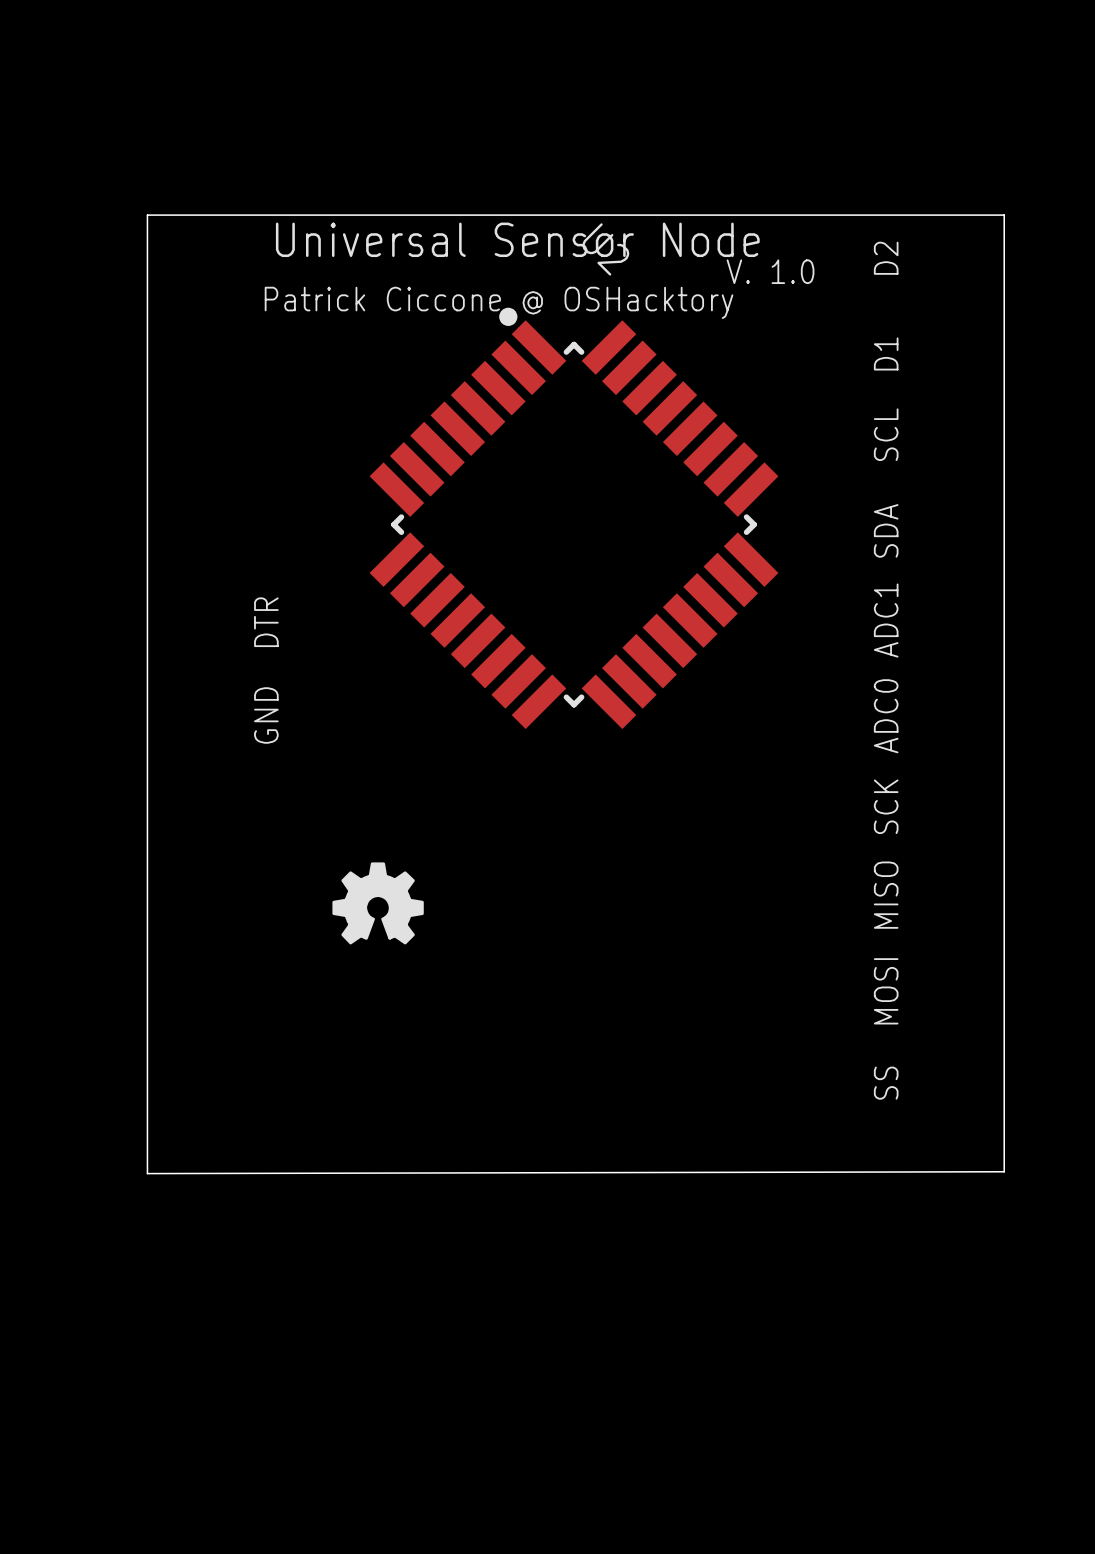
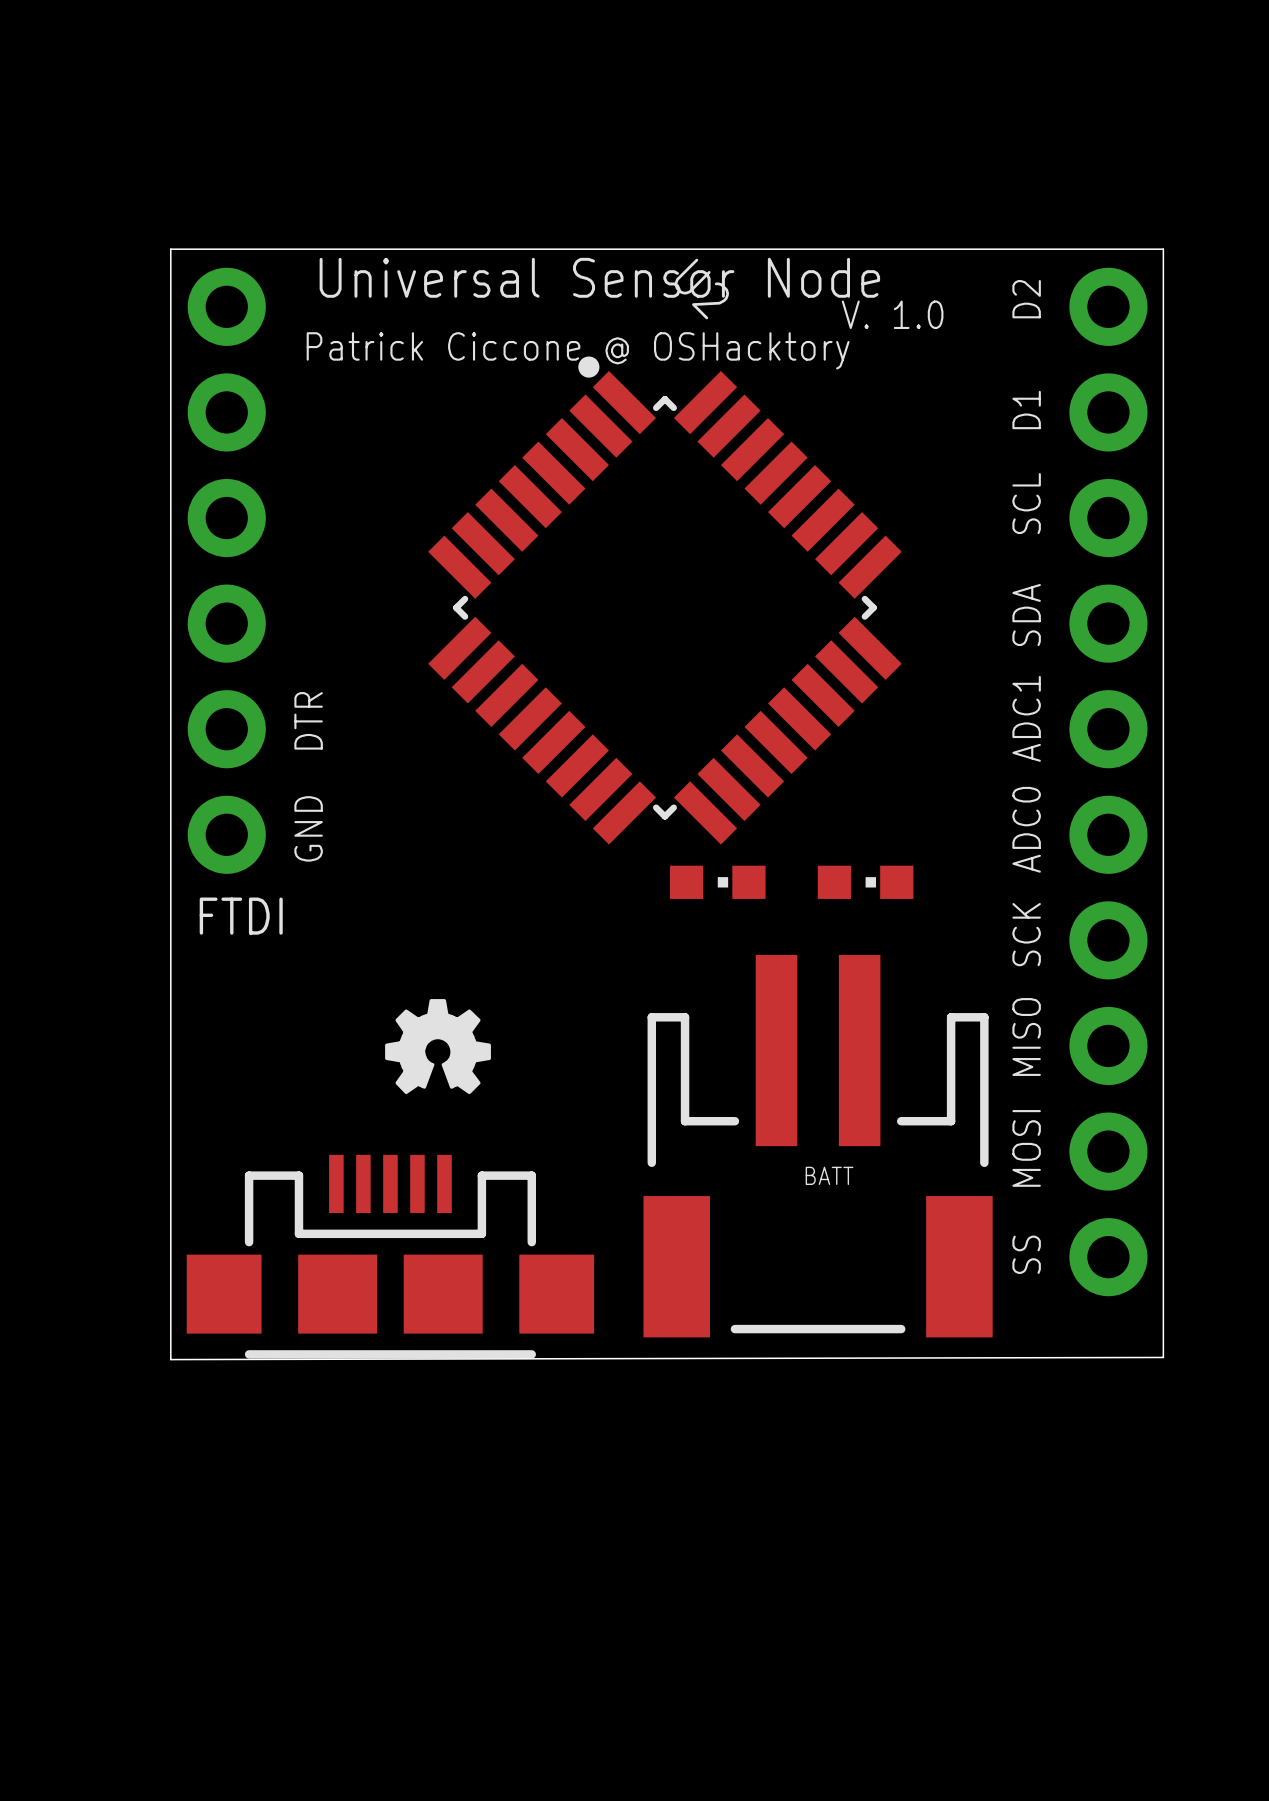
FTDI: none -> (226, 570)
part: none -> (1108, 782)
part: none -> (717, 882)
part: none -> (865, 882)
BATT: none -> (818, 1146)
part: none -> (390, 1256)

